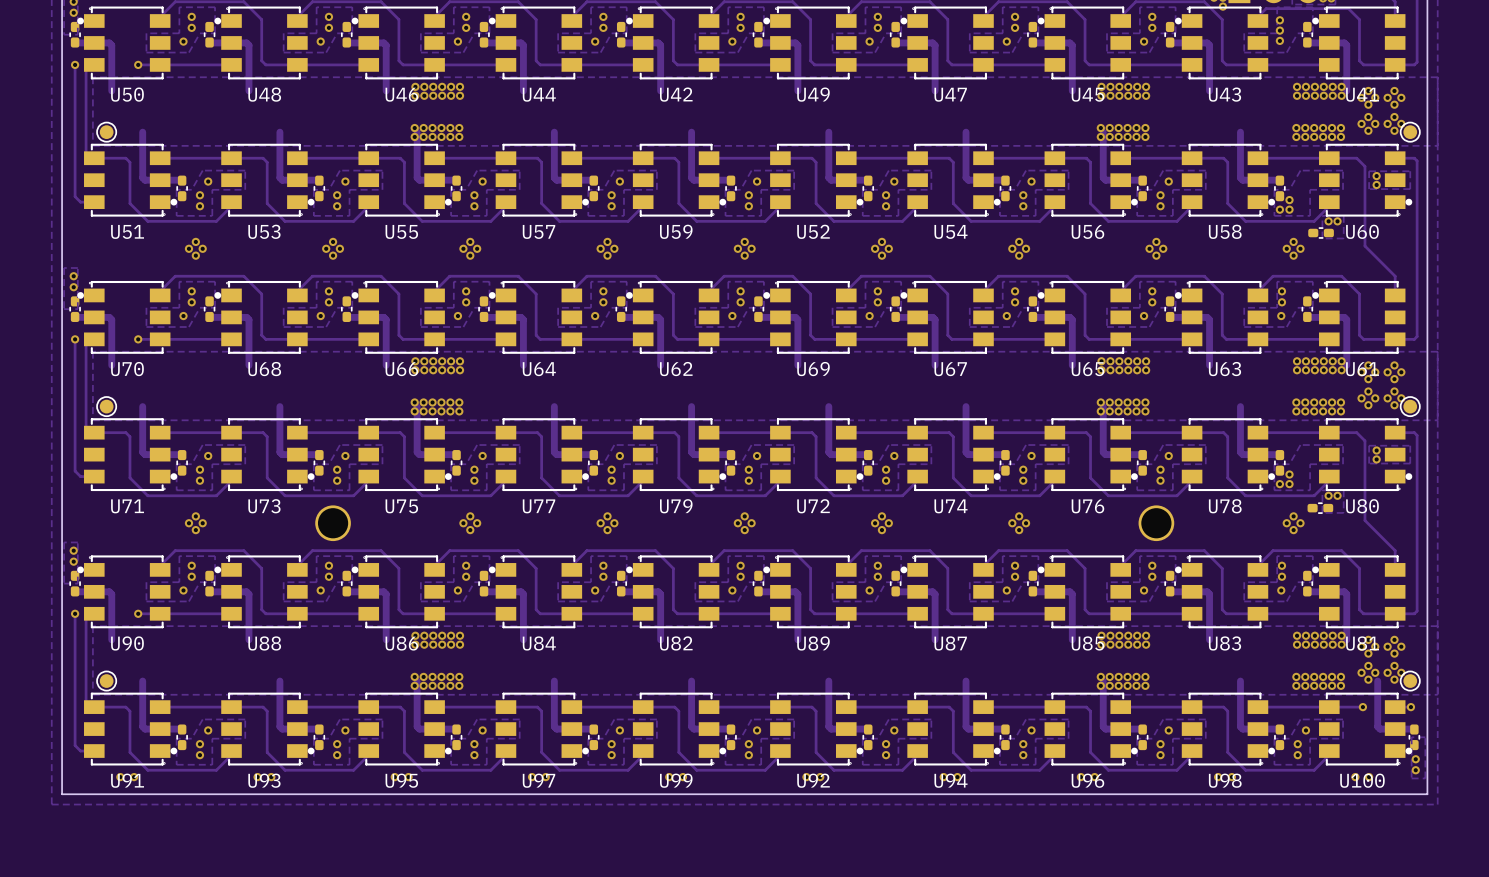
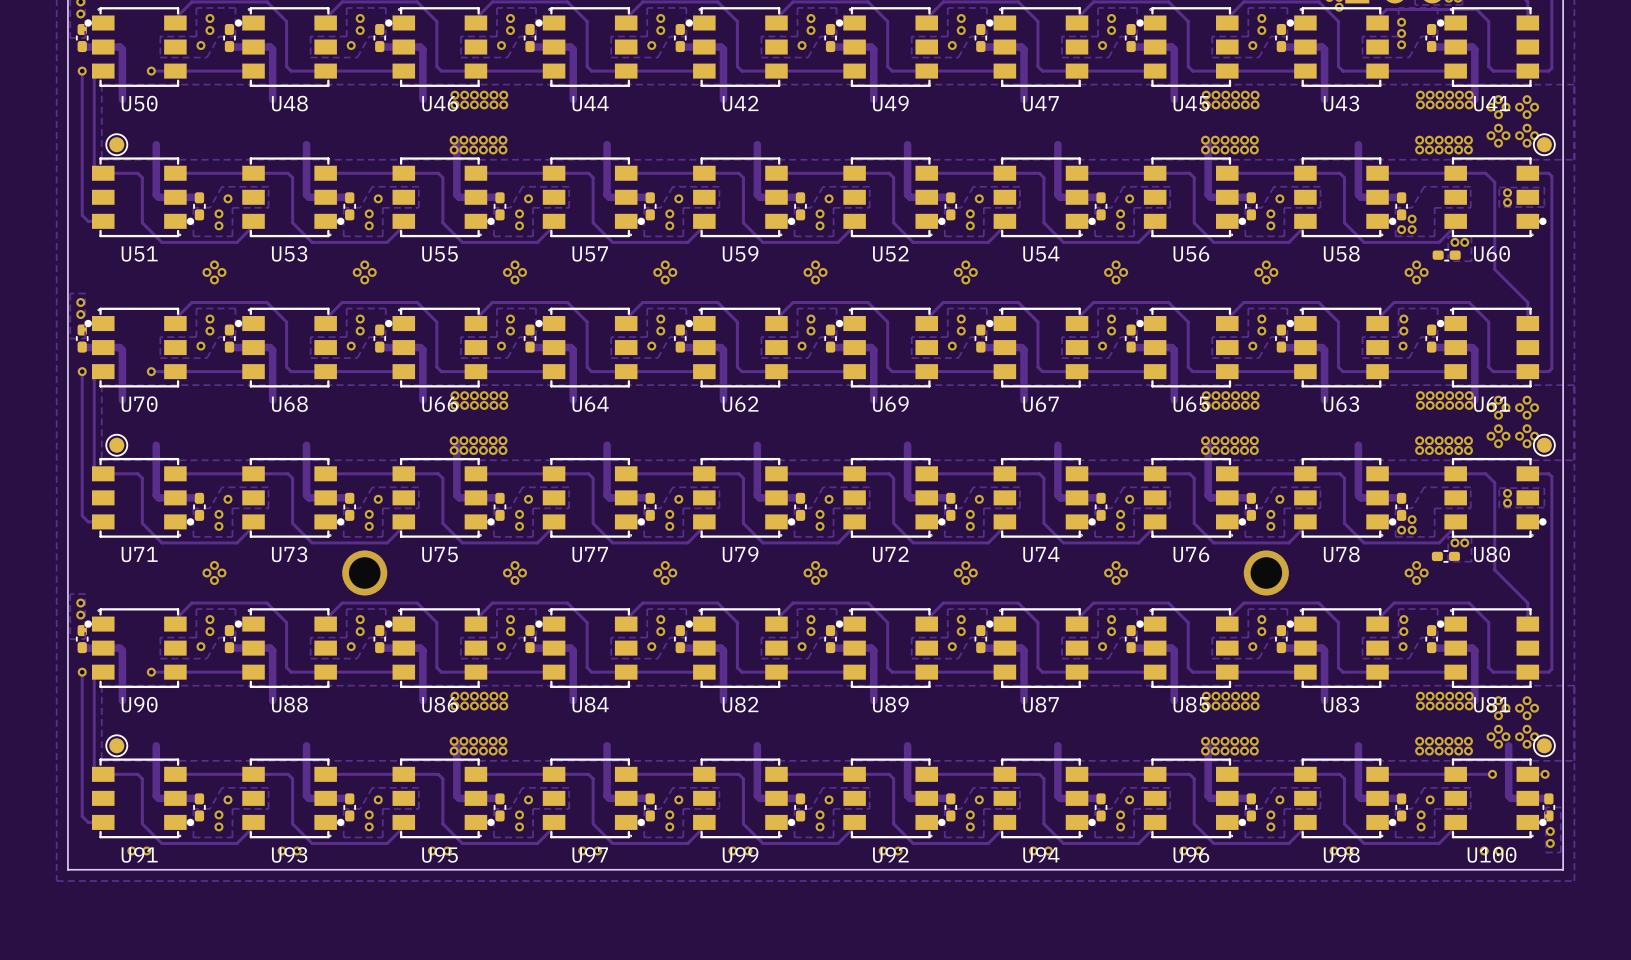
part: (333, 523) -> none
via: none -> (364, 572)
part: (1156, 523) -> none
via: none -> (1266, 572)

